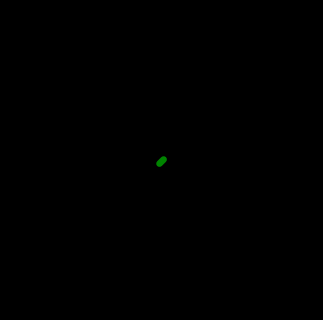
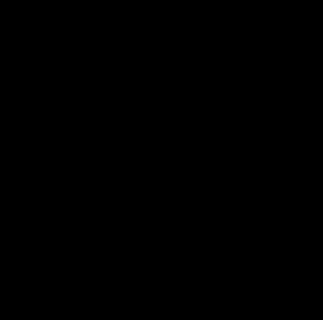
bottom track: (163, 159) (159, 163) -> none

